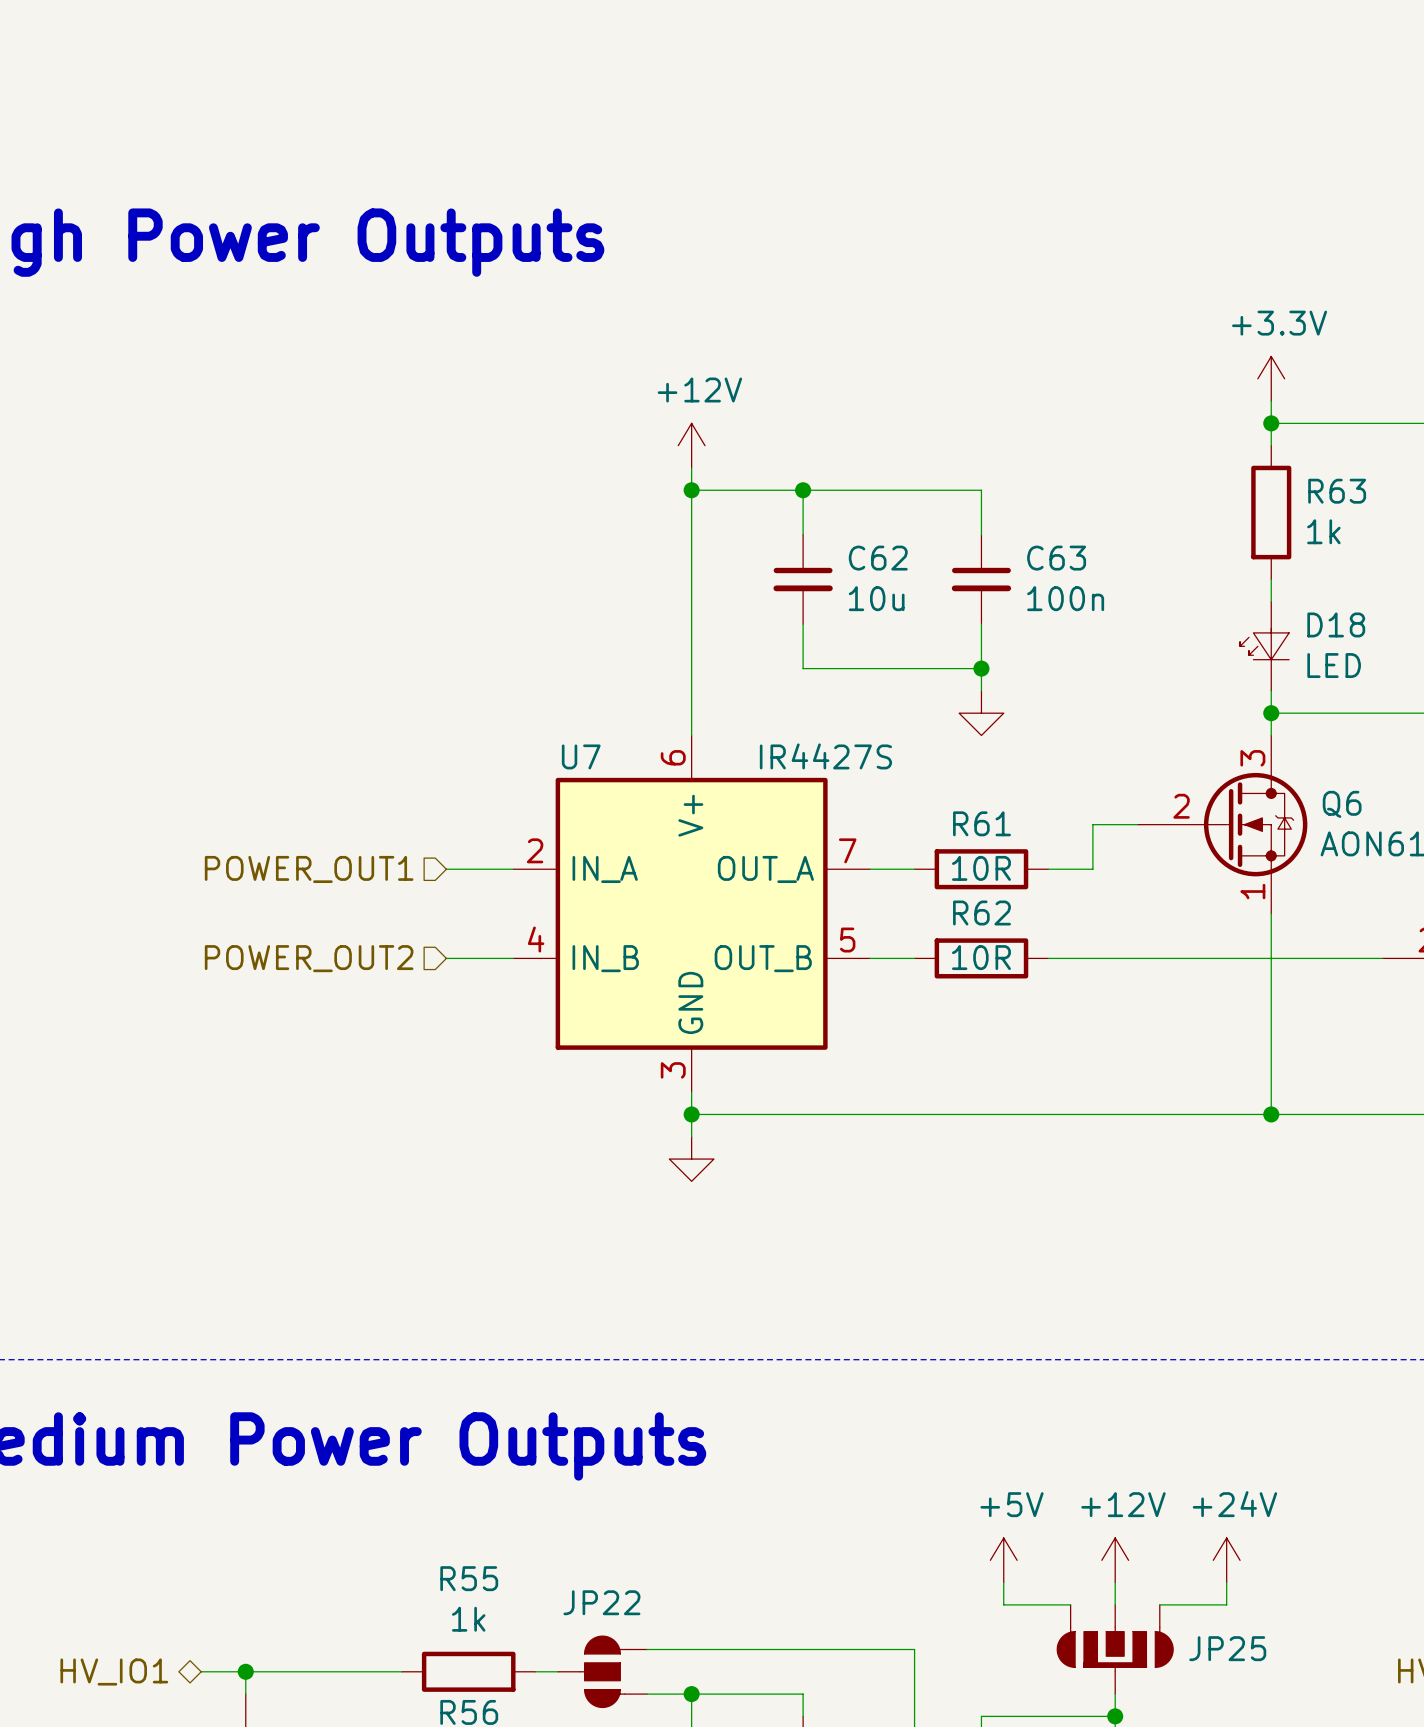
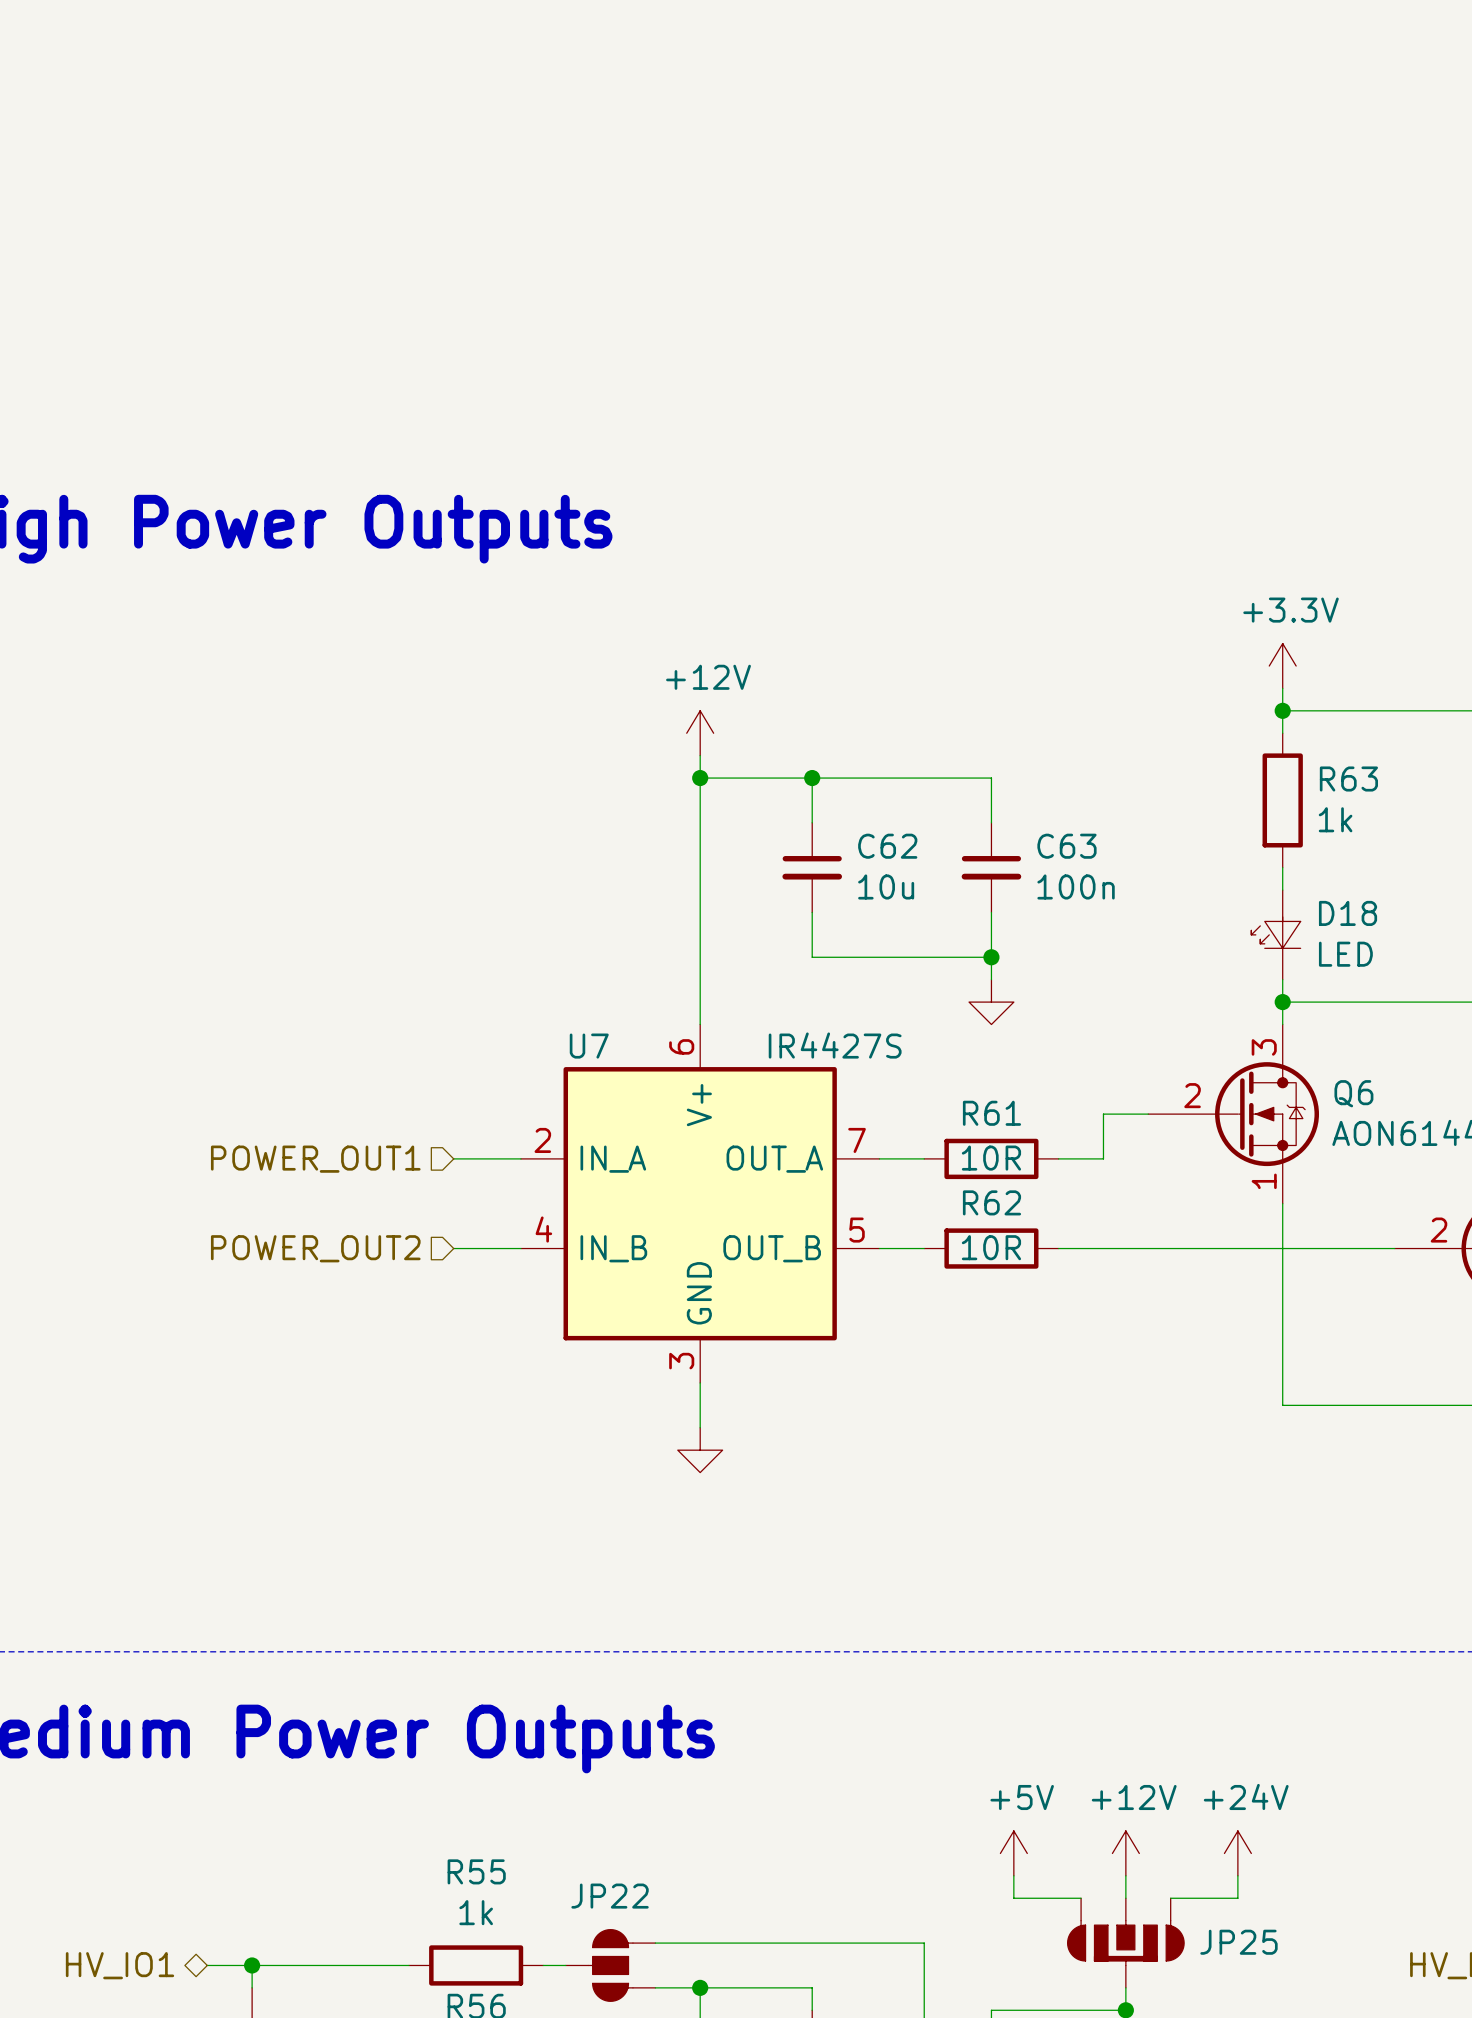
wire: (691, 1114) (1271, 1114) -> none
junction: (691, 1114) -> none
junction: (1271, 1114) -> none

